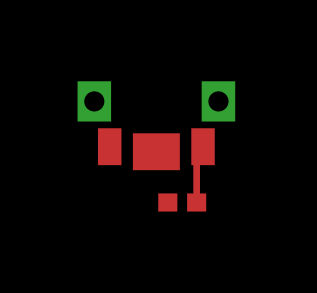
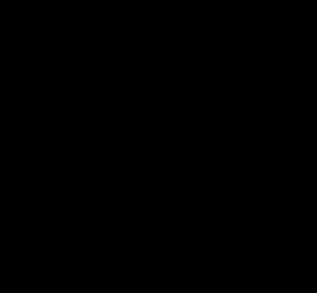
part: (156, 125) -> none
top track: (200, 154) (196, 158) (196, 202) -> none
part: (182, 202) -> none

